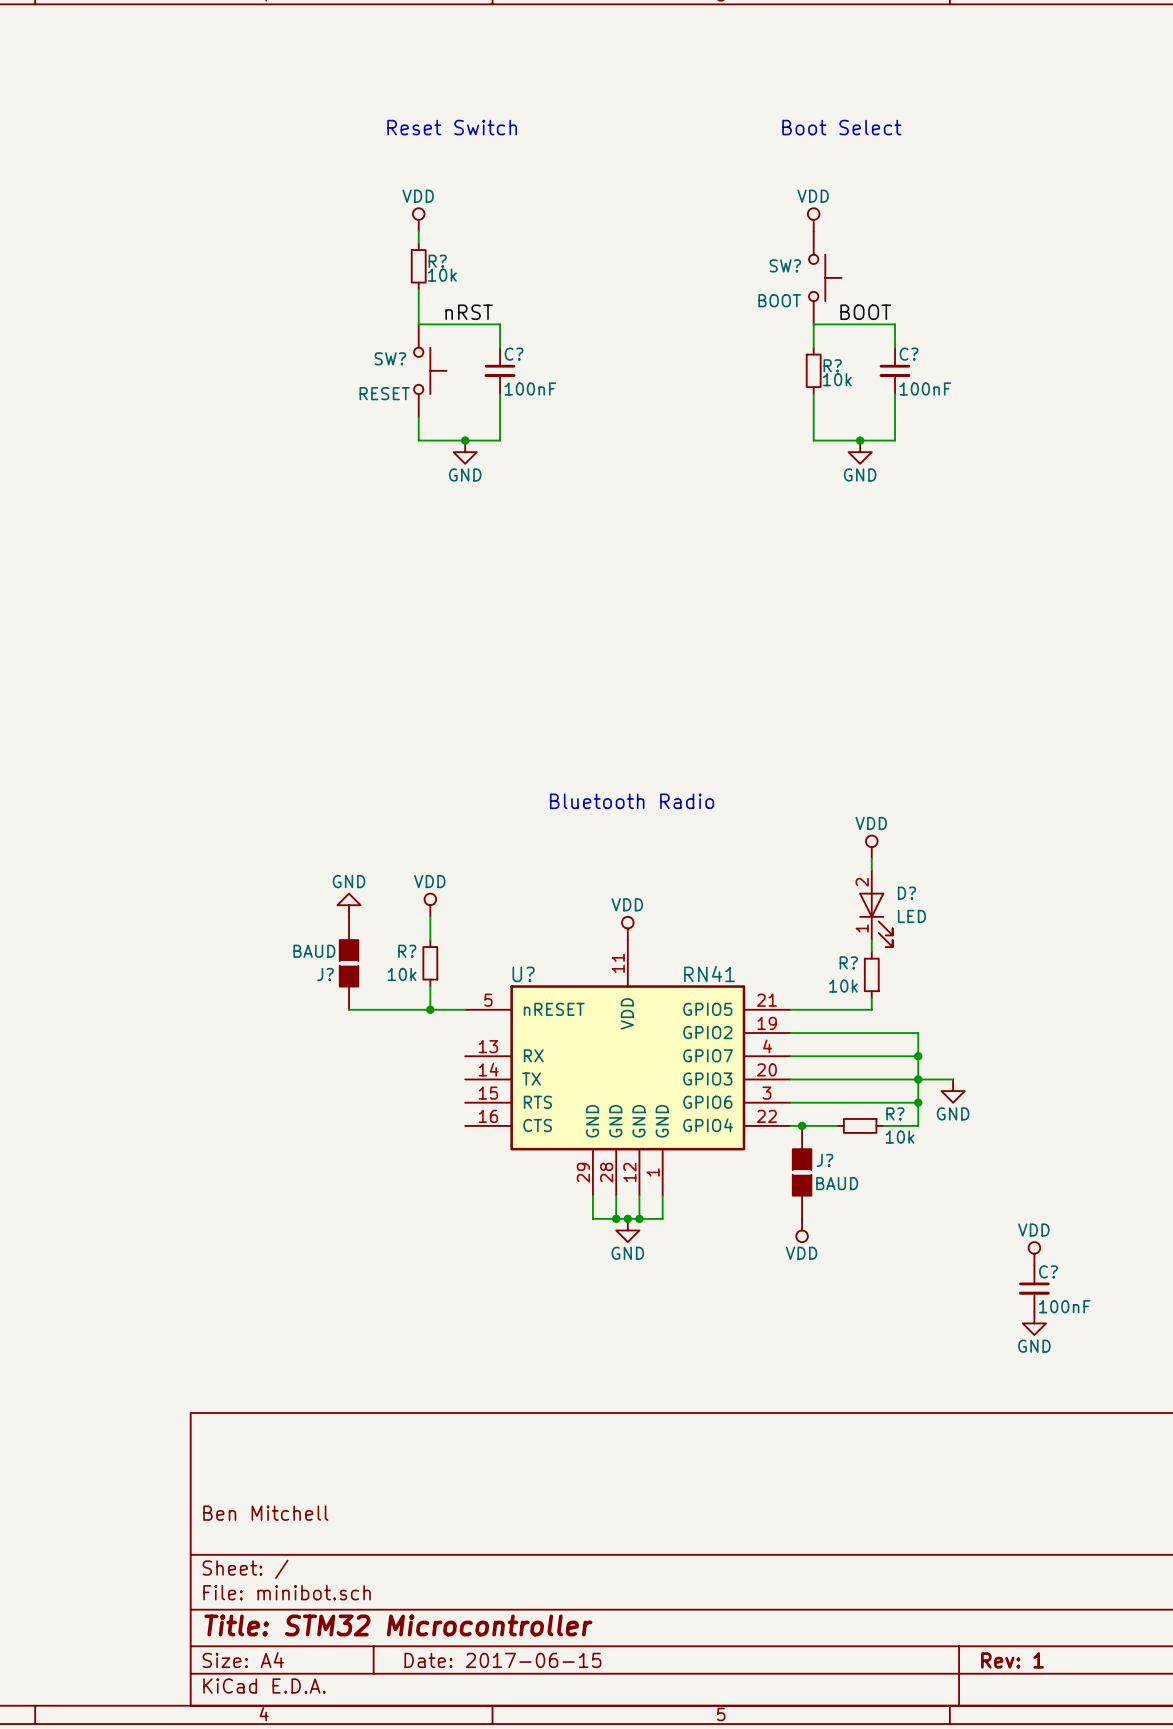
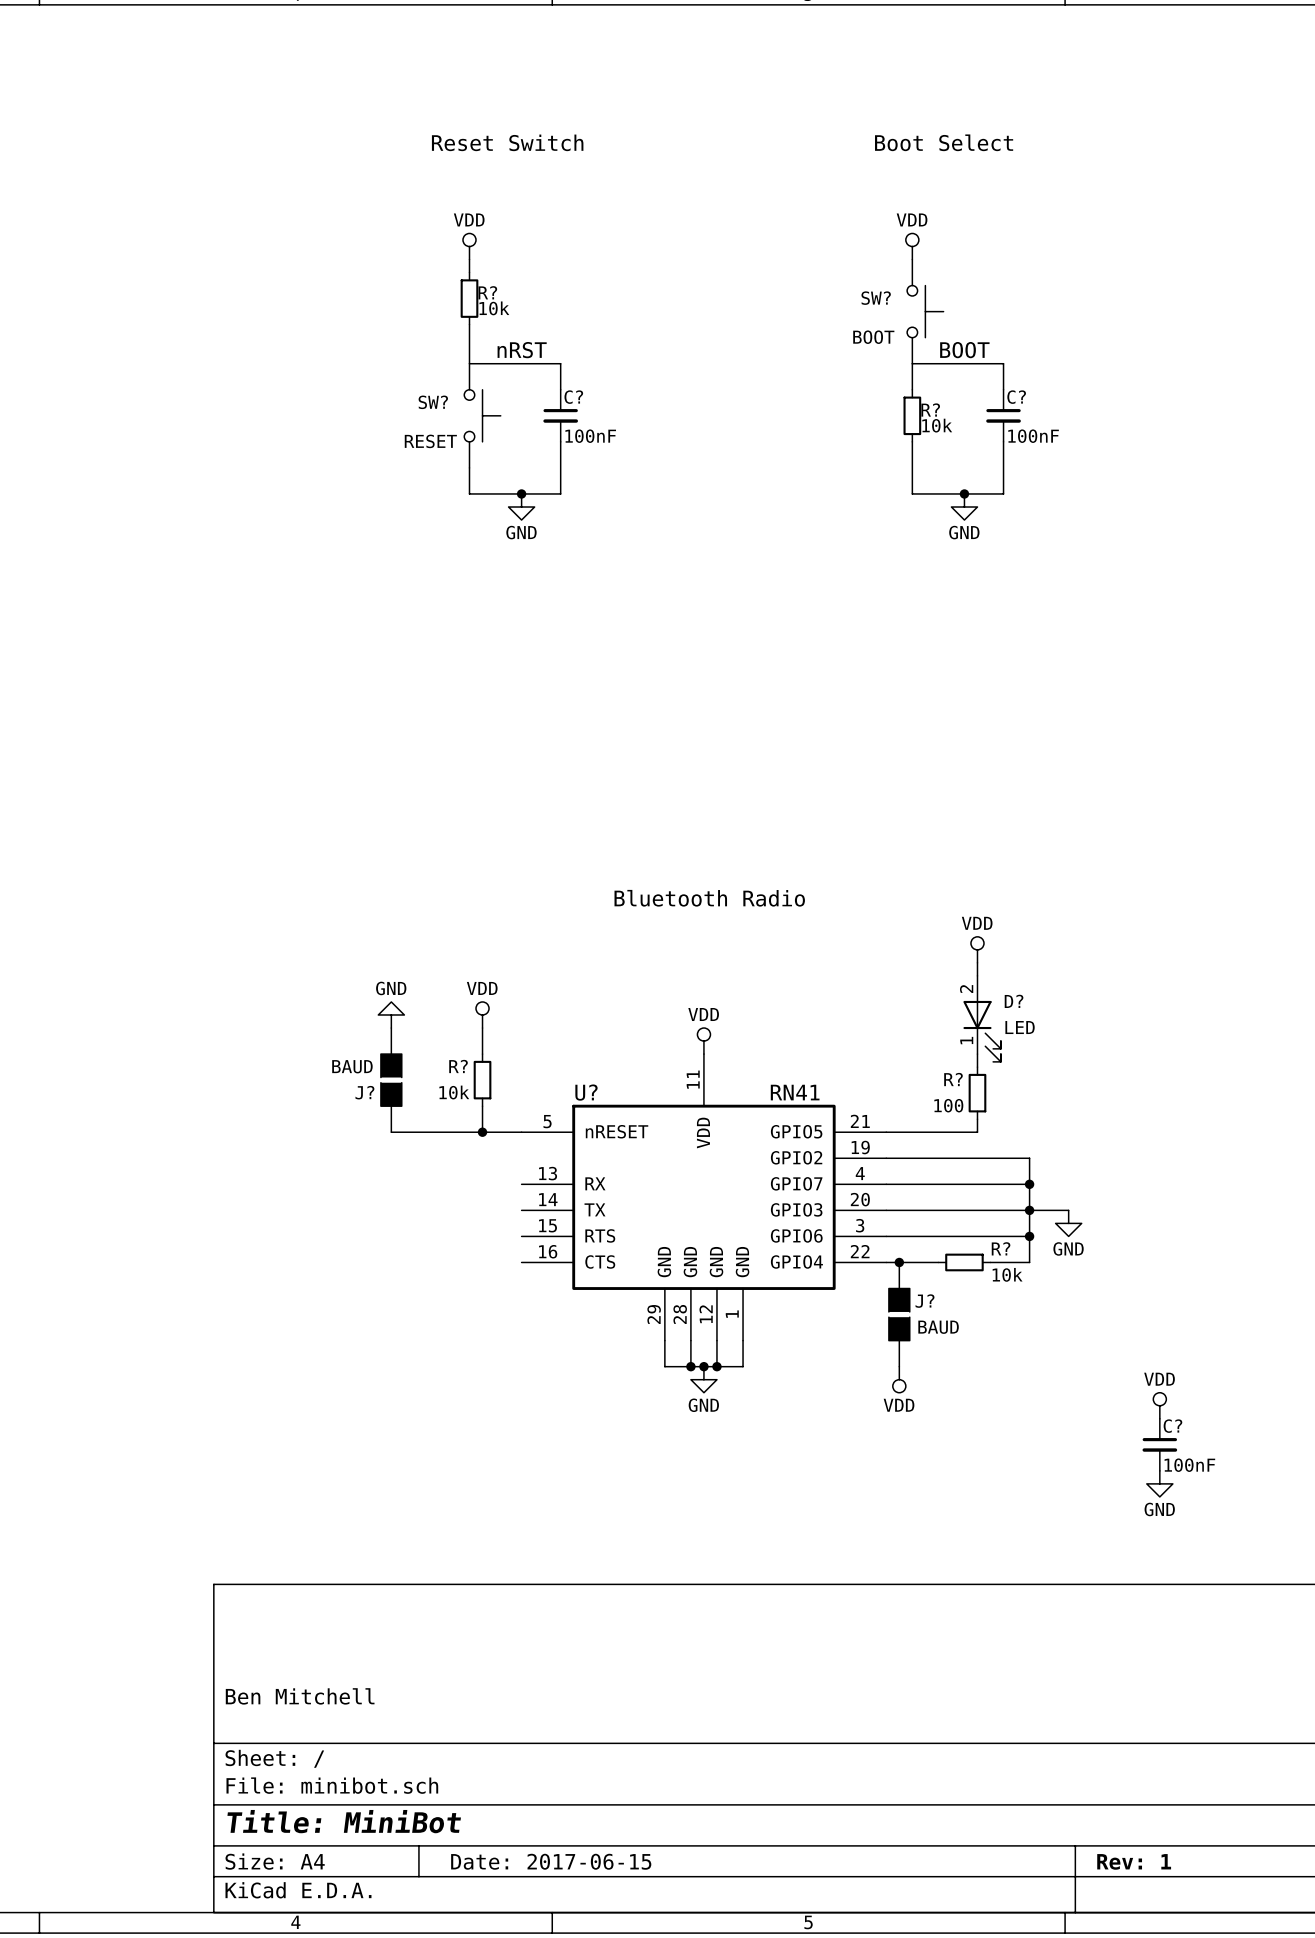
R? value: 10k (843, 986) -> 100 (948, 1105)
title block: Title: STM32 Microcontroller (398, 1625) -> Title: MiniBot (344, 1821)

